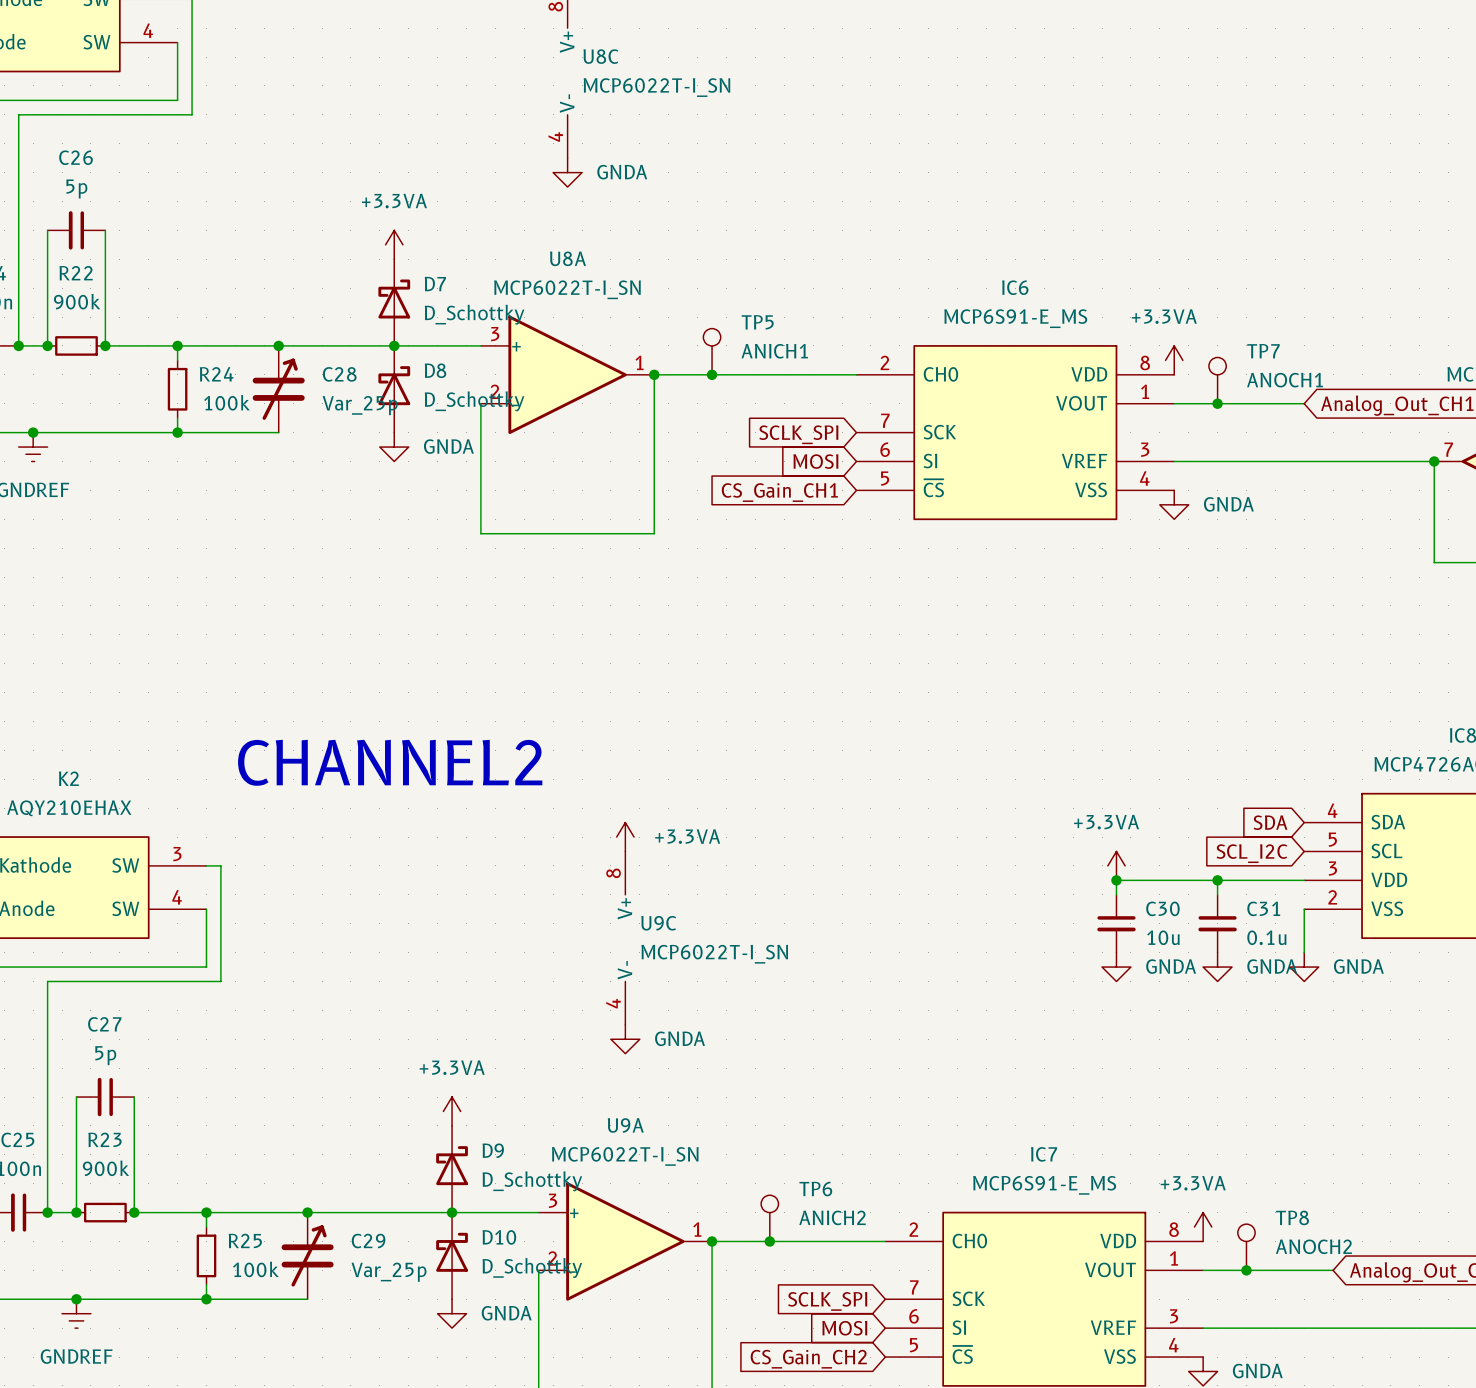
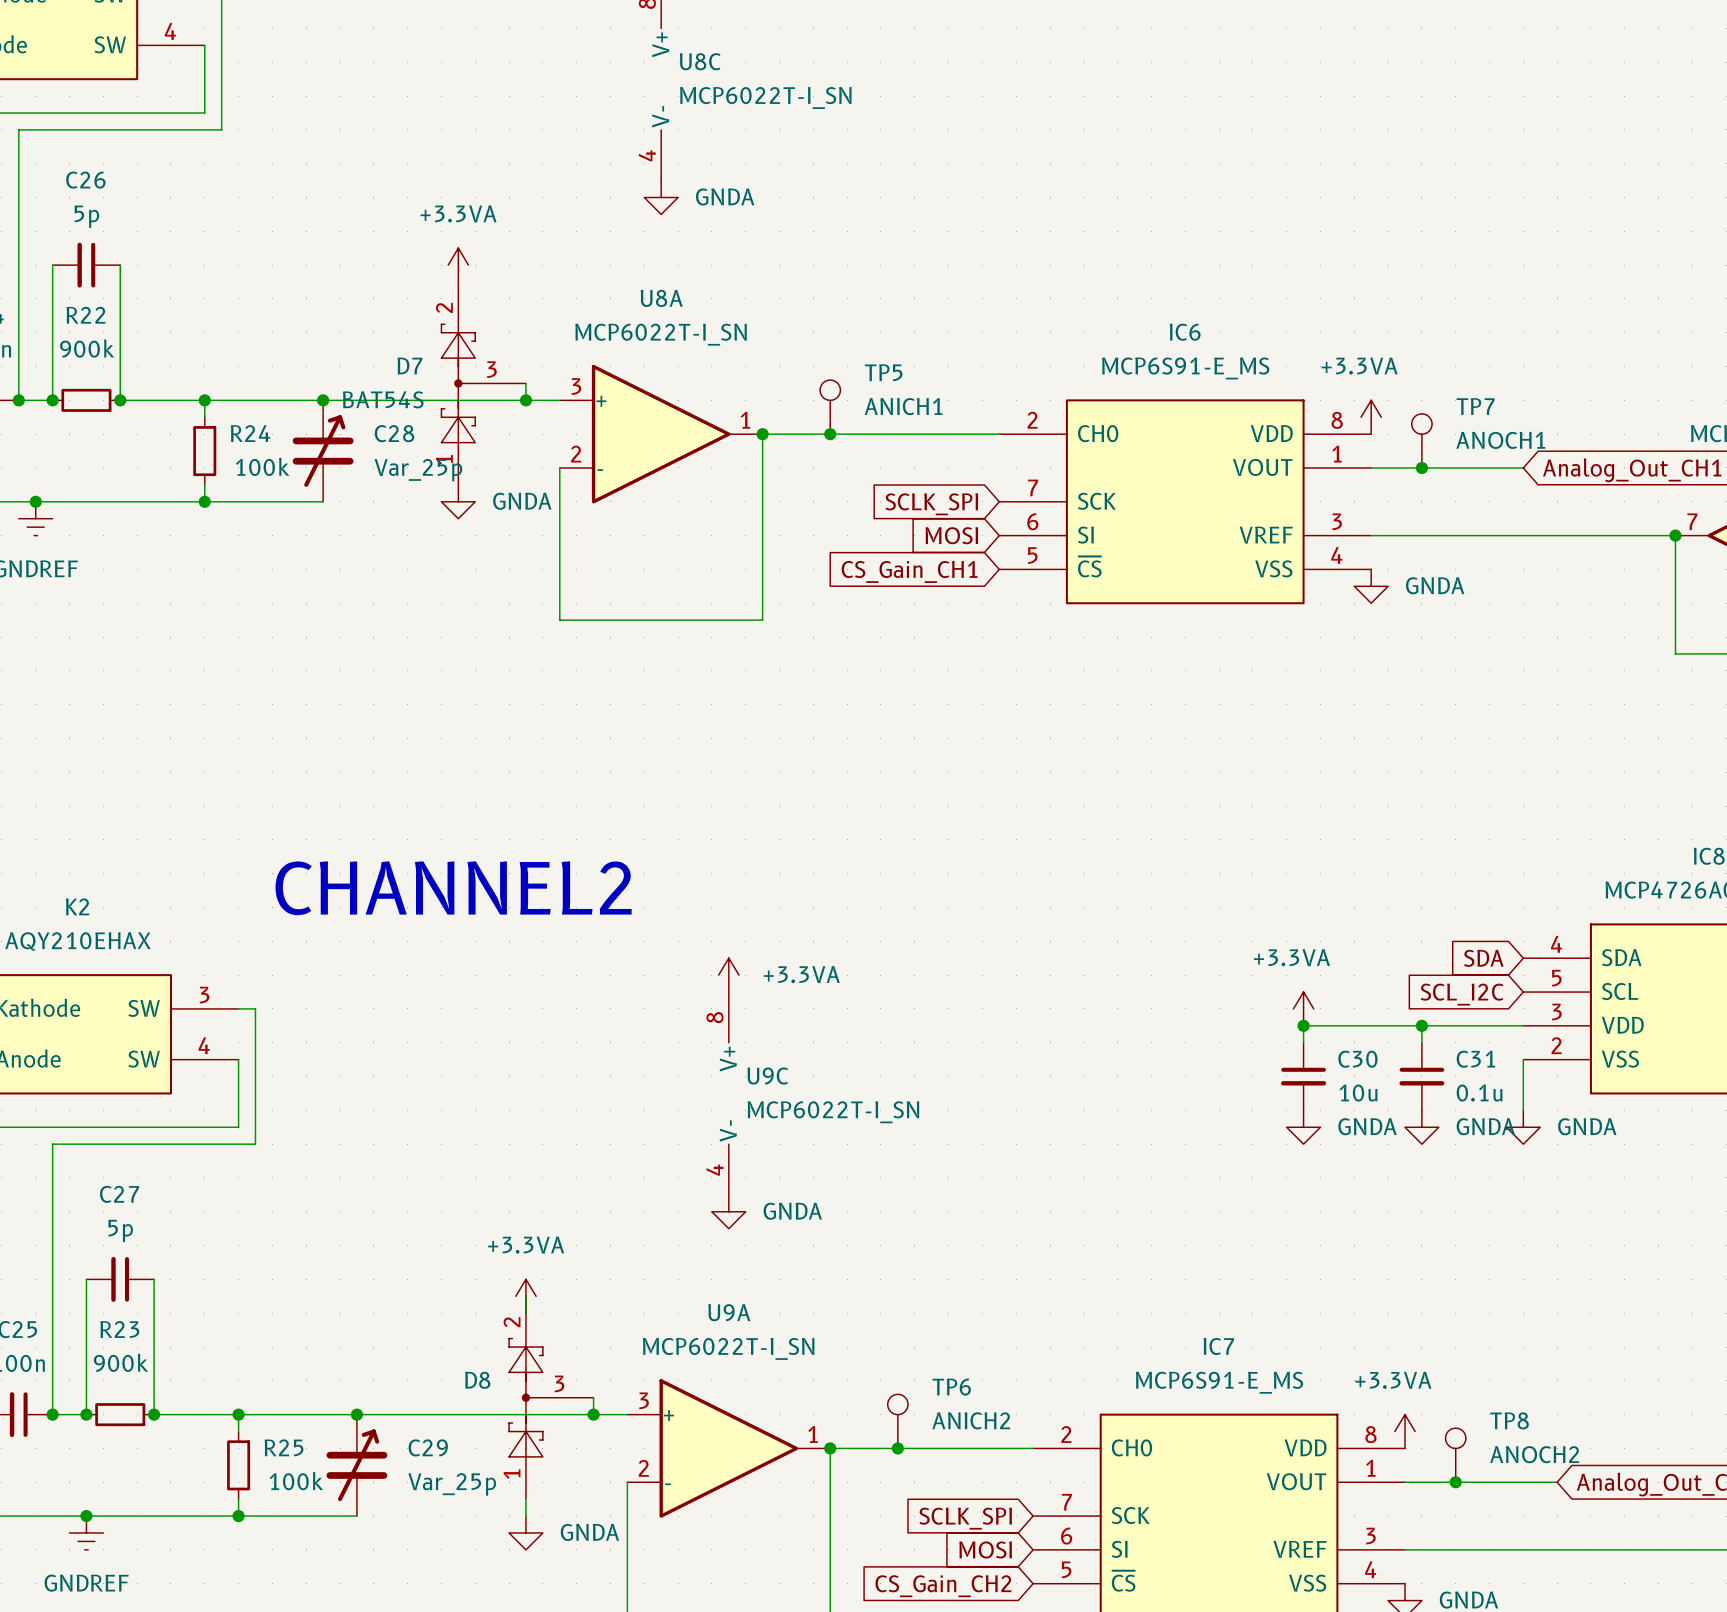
power symbol position: +3.3VA (394, 244) -> +3.3VA (458, 265)
D7 symbol: [378, 259, 411, 346] -> [441, 282, 526, 485]
D7 name position: D7 (435, 284) -> D7 (409, 365)
D7 value: D_Schottky (474, 314) -> BAT54S (383, 399)
wire: none -> (525, 383) (525, 400)
D8 symbol: [378, 345, 411, 433] -> [509, 1296, 594, 1500]
junction position: (394, 345) -> (525, 400)
D8 name position: D8 (435, 370) -> D8 (477, 1380)
D8 value: D_Schottky (474, 401) -> none
power symbol position: GNDA (394, 447) -> GNDA (458, 501)
D9: D_Schottky (452, 1169) -> none
wire: none -> (593, 1397) (593, 1414)
junction position: (452, 1212) -> (593, 1414)
D10: D_Schottky (452, 1255) -> none

